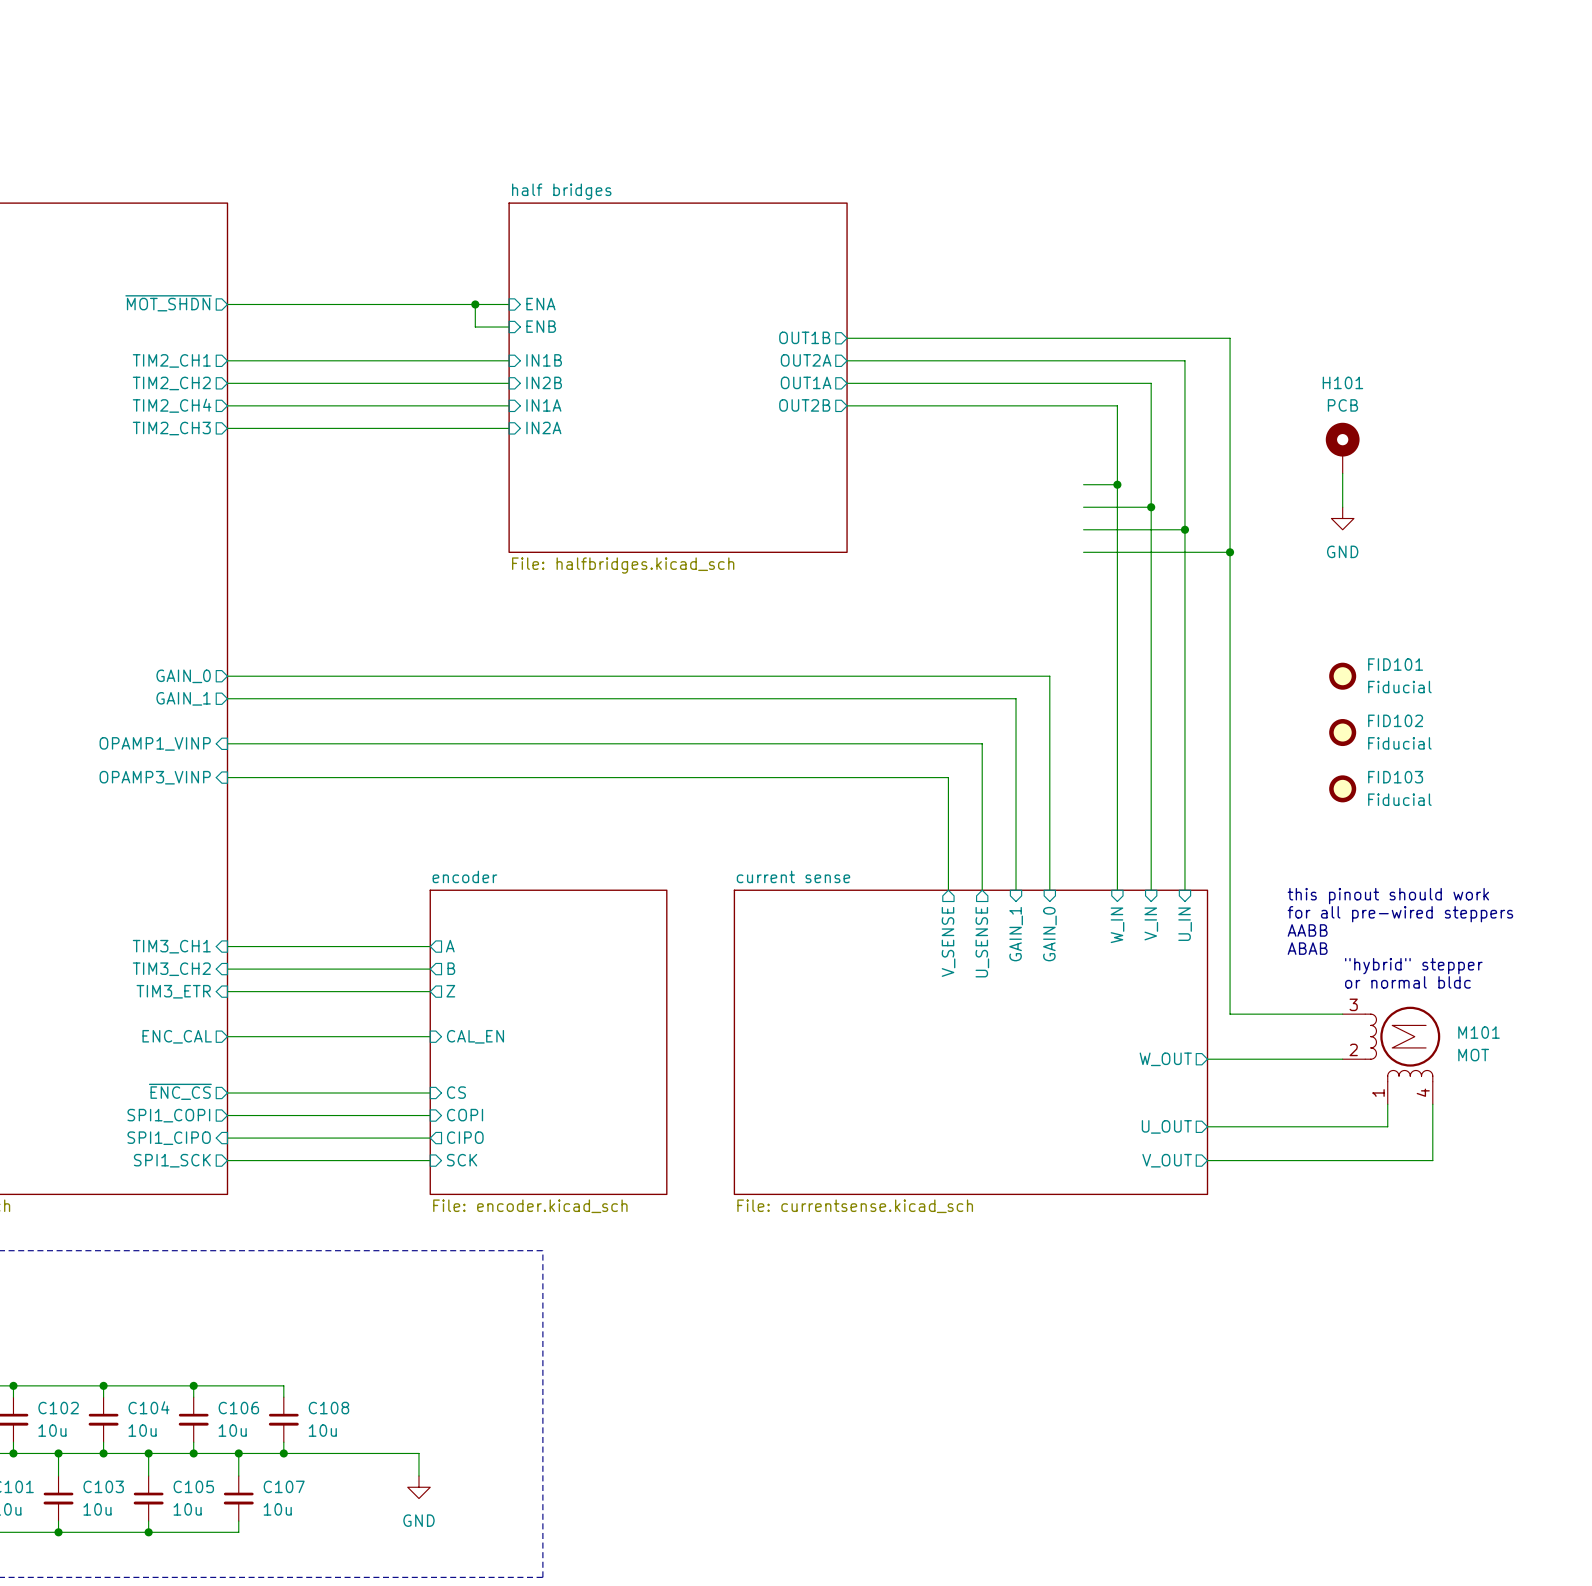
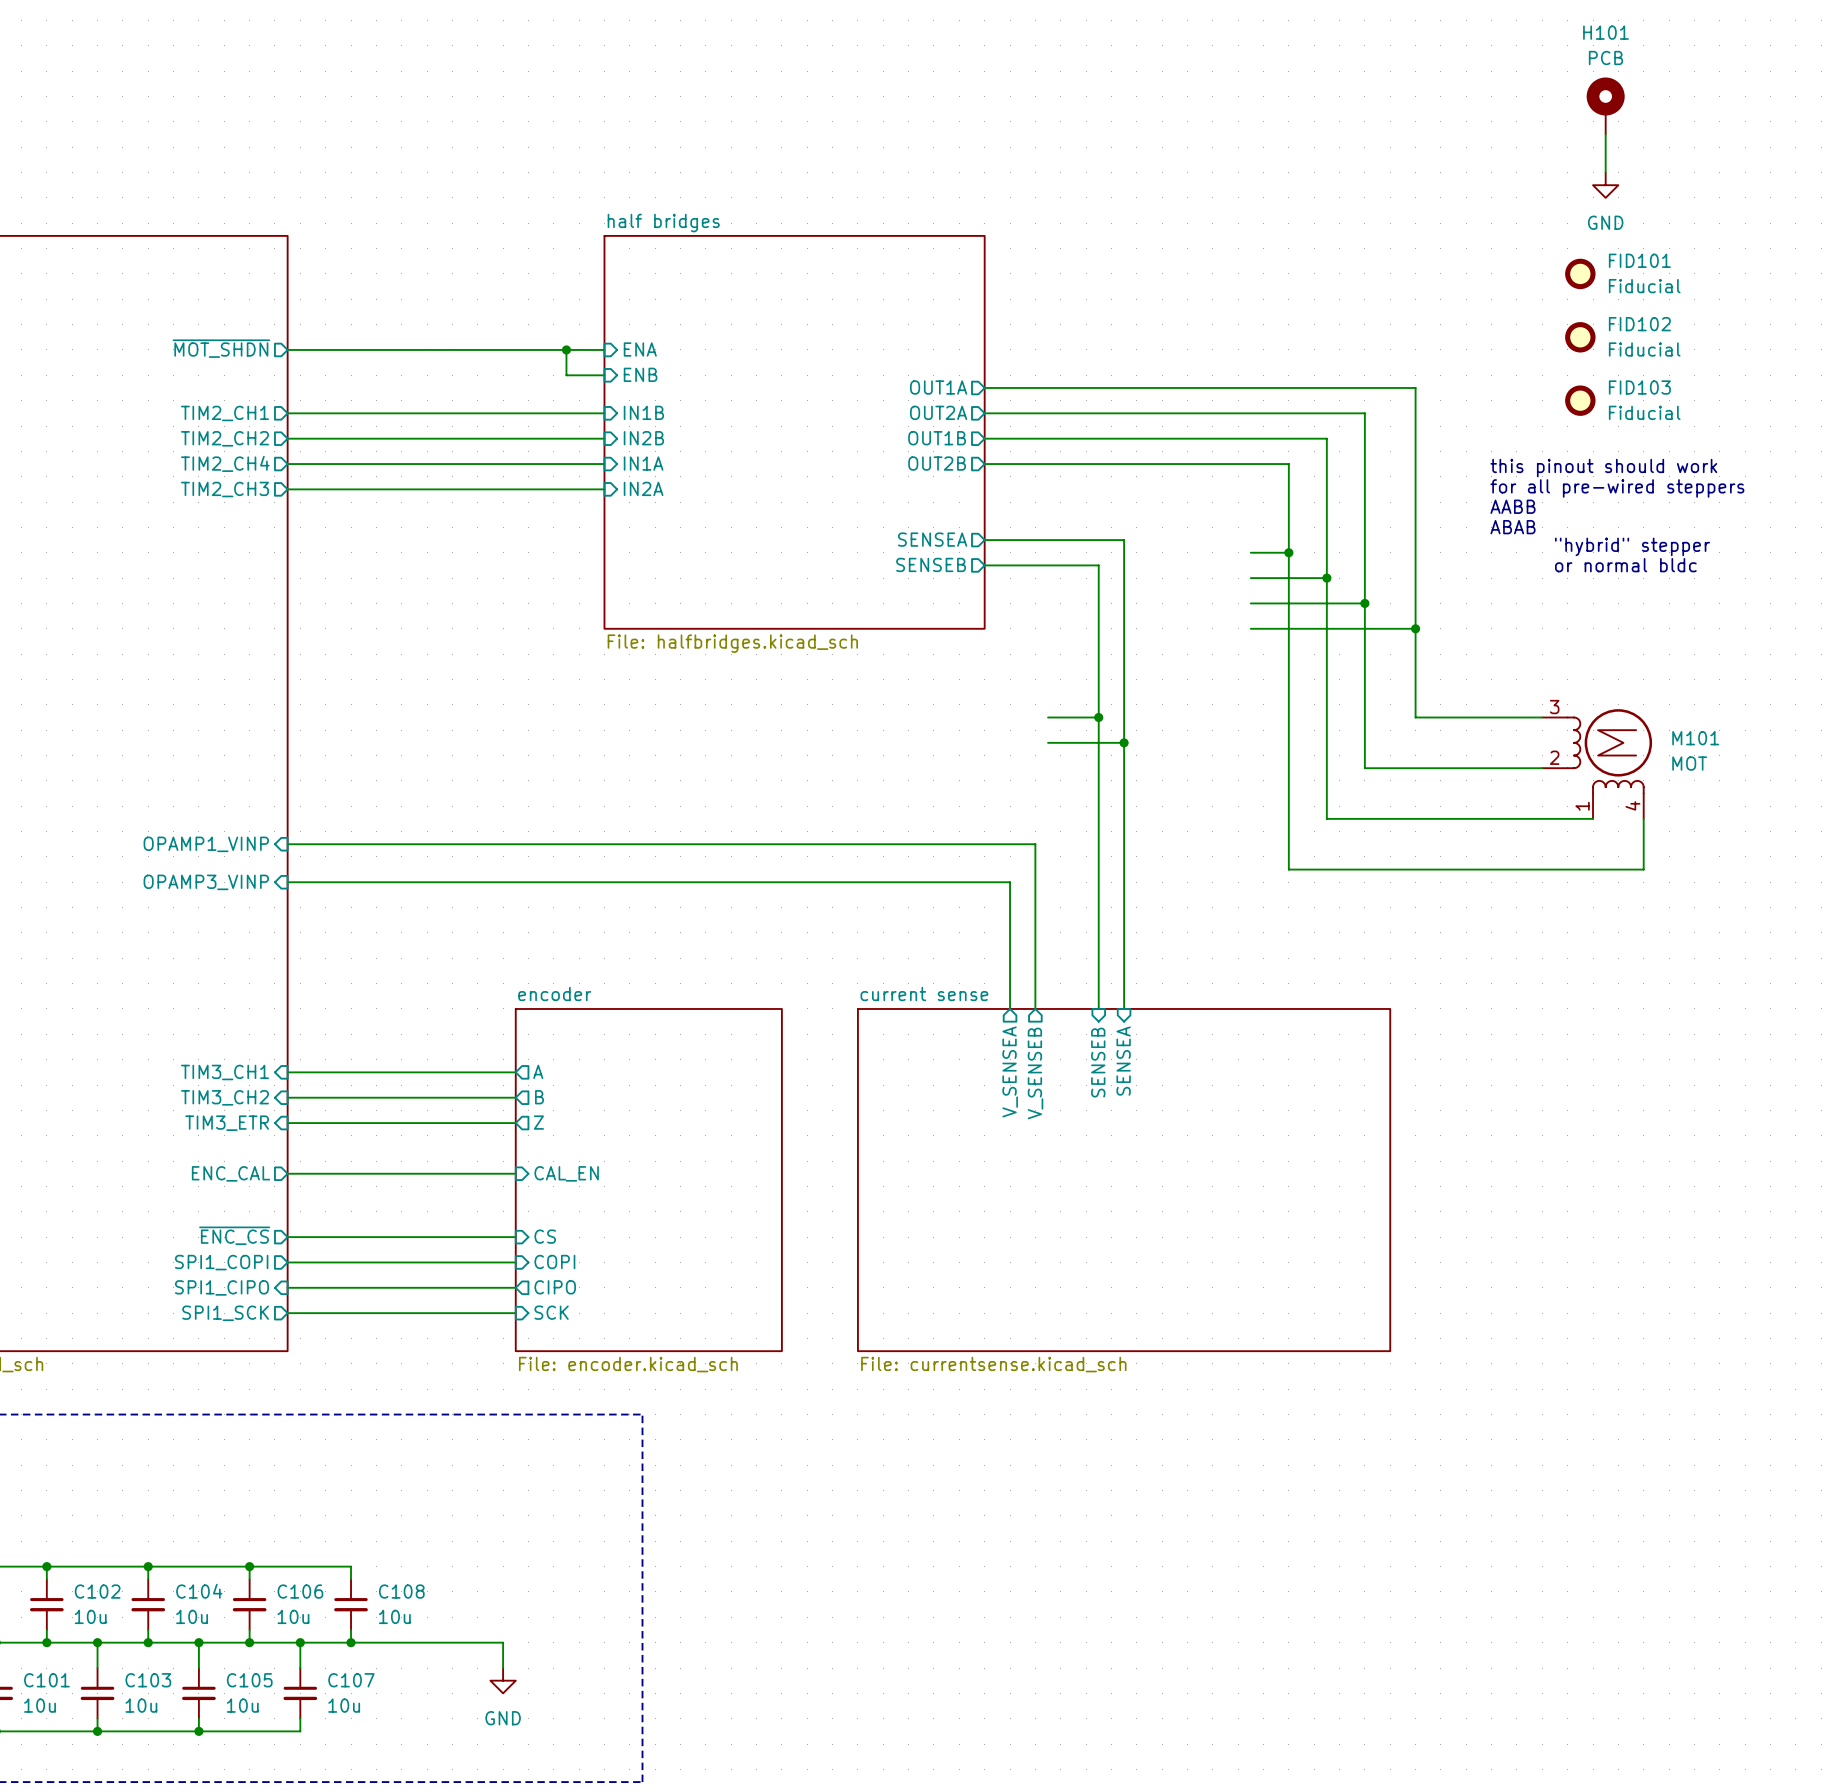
wire: none -> (1605, 134) (1605, 172)
power symbol: none -> GND (1605, 185)
sheet pin: OUT1B (804, 337) -> OUT1A (938, 387)
sheet pin: OUT1A (806, 382) -> OUT1B (937, 438)
text: none -> this pinout should work (1603, 468)
text: none -> for all pre-wired steppers (1617, 488)
text: none -> AABB (1513, 506)
H101 position: (1342, 448) -> (1605, 106)
text: none -> ABAB (1513, 527)
sheet pin: none -> SENSEA (932, 539)
wire: none -> (984, 540) (1124, 540) (1124, 1008)
wire: (1342, 473) (1342, 507) -> none
text: none -> "hybrid" stepper (1632, 546)
sheet pin: none -> SENSEB (931, 564)
wire: none -> (984, 565) (1098, 565) (1098, 882)
text: none -> or normal bldc (1625, 565)
power symbol: GND (1342, 518) -> none
wire: none -> (1048, 717) (1098, 717)
junction: none -> (1098, 717)
wire: (1230, 631) (1230, 1014) (1342, 1014) -> (1415, 717) (1542, 717)
wire: none -> (1048, 742) (1124, 742)
junction: none -> (1124, 742)
sheet pin: GAIN_0 (183, 676) -> none
wire: (227, 676) (1049, 676) (1049, 890) -> none
wire: (1184, 676) (1184, 890) -> (1364, 768) (1542, 768)
FID101 position: (1342, 676) -> (1580, 273)
sheet pin: GAIN_1 (183, 698) -> none
wire: (227, 698) (1016, 698) (1016, 890) -> none
wire: (1151, 721) (1151, 890) -> (1326, 818) (1593, 818)
FID102 position: (1342, 732) -> (1580, 337)
wire: (892, 743) (982, 743) (982, 890) -> (1035, 844) (1035, 1008)
wire: (1117, 766) (1117, 890) -> (1288, 869) (1643, 869) (1643, 818)
wire: (869, 777) (948, 777) -> (1010, 882) (1010, 1008)
FID103 position: (1342, 788) -> (1580, 400)
text: this pinout should work (1388, 896) -> none
text: for all pre-wired steppers (1400, 914) -> none
sheet pin: V_IN (1151, 923) -> none
sheet pin: U_IN (1185, 924) -> none
sheet pin: W_IN (1117, 925) -> none
text: AABB (1307, 930) -> none
sheet pin: GAIN_1 (1016, 934) -> none
sheet pin: GAIN_0 (1049, 934) -> none
sheet pin shape: output (948, 941) -> input (1098, 1062)
sheet pin: V_SENSE (948, 941) -> SENSEB (1098, 1062)
sheet pin shape: output (982, 942) -> input (1123, 1061)
sheet pin: U_SENSE (982, 942) -> SENSEA (1123, 1061)
sheet pin: none -> V_SENSEA (1010, 1071)
sheet pin: none -> V_SENSEB (1035, 1073)
text: ABAB (1307, 948) -> none
text: "hybrid" stepper (1413, 966) -> none
text: or normal bldc (1407, 982) -> none
M101 position: (1391, 1055) -> (1597, 764)
sheet pin: W_OUT (1165, 1059) -> none
wire: (1207, 1059) (1342, 1059) -> none
wire: (1387, 1104) (1387, 1126) (1207, 1126) -> none
wire: (1432, 1104) (1432, 1160) (1207, 1160) -> none
sheet pin: U_OUT (1166, 1126) -> none
sheet pin: V_OUT (1167, 1160) -> none

